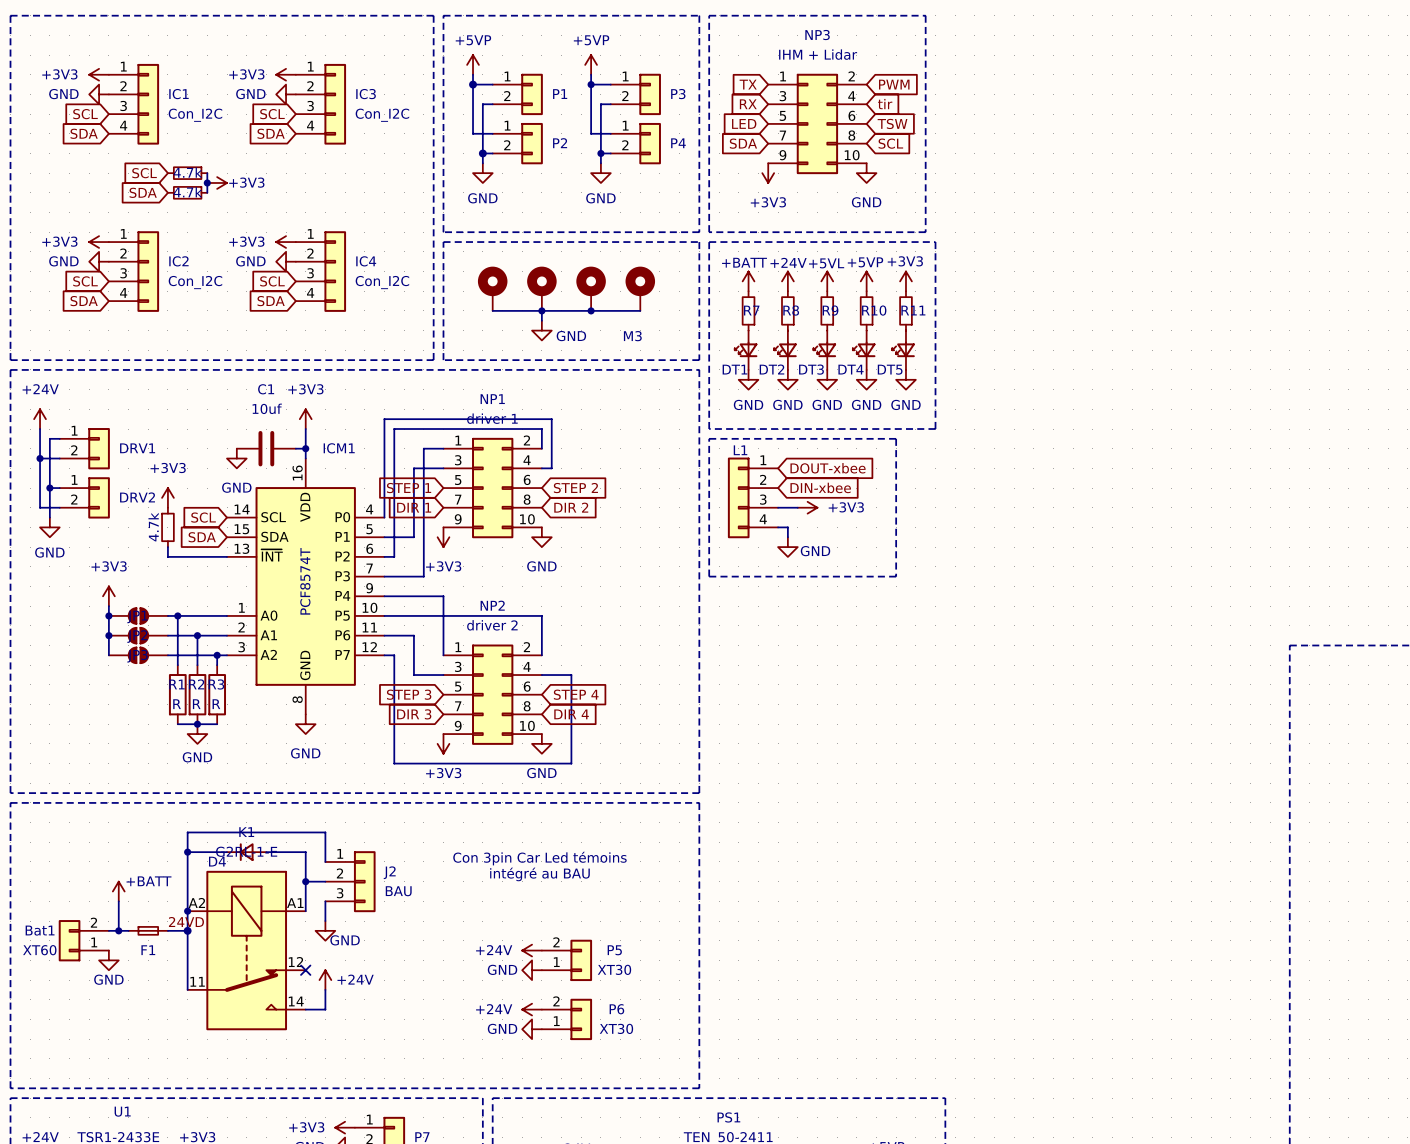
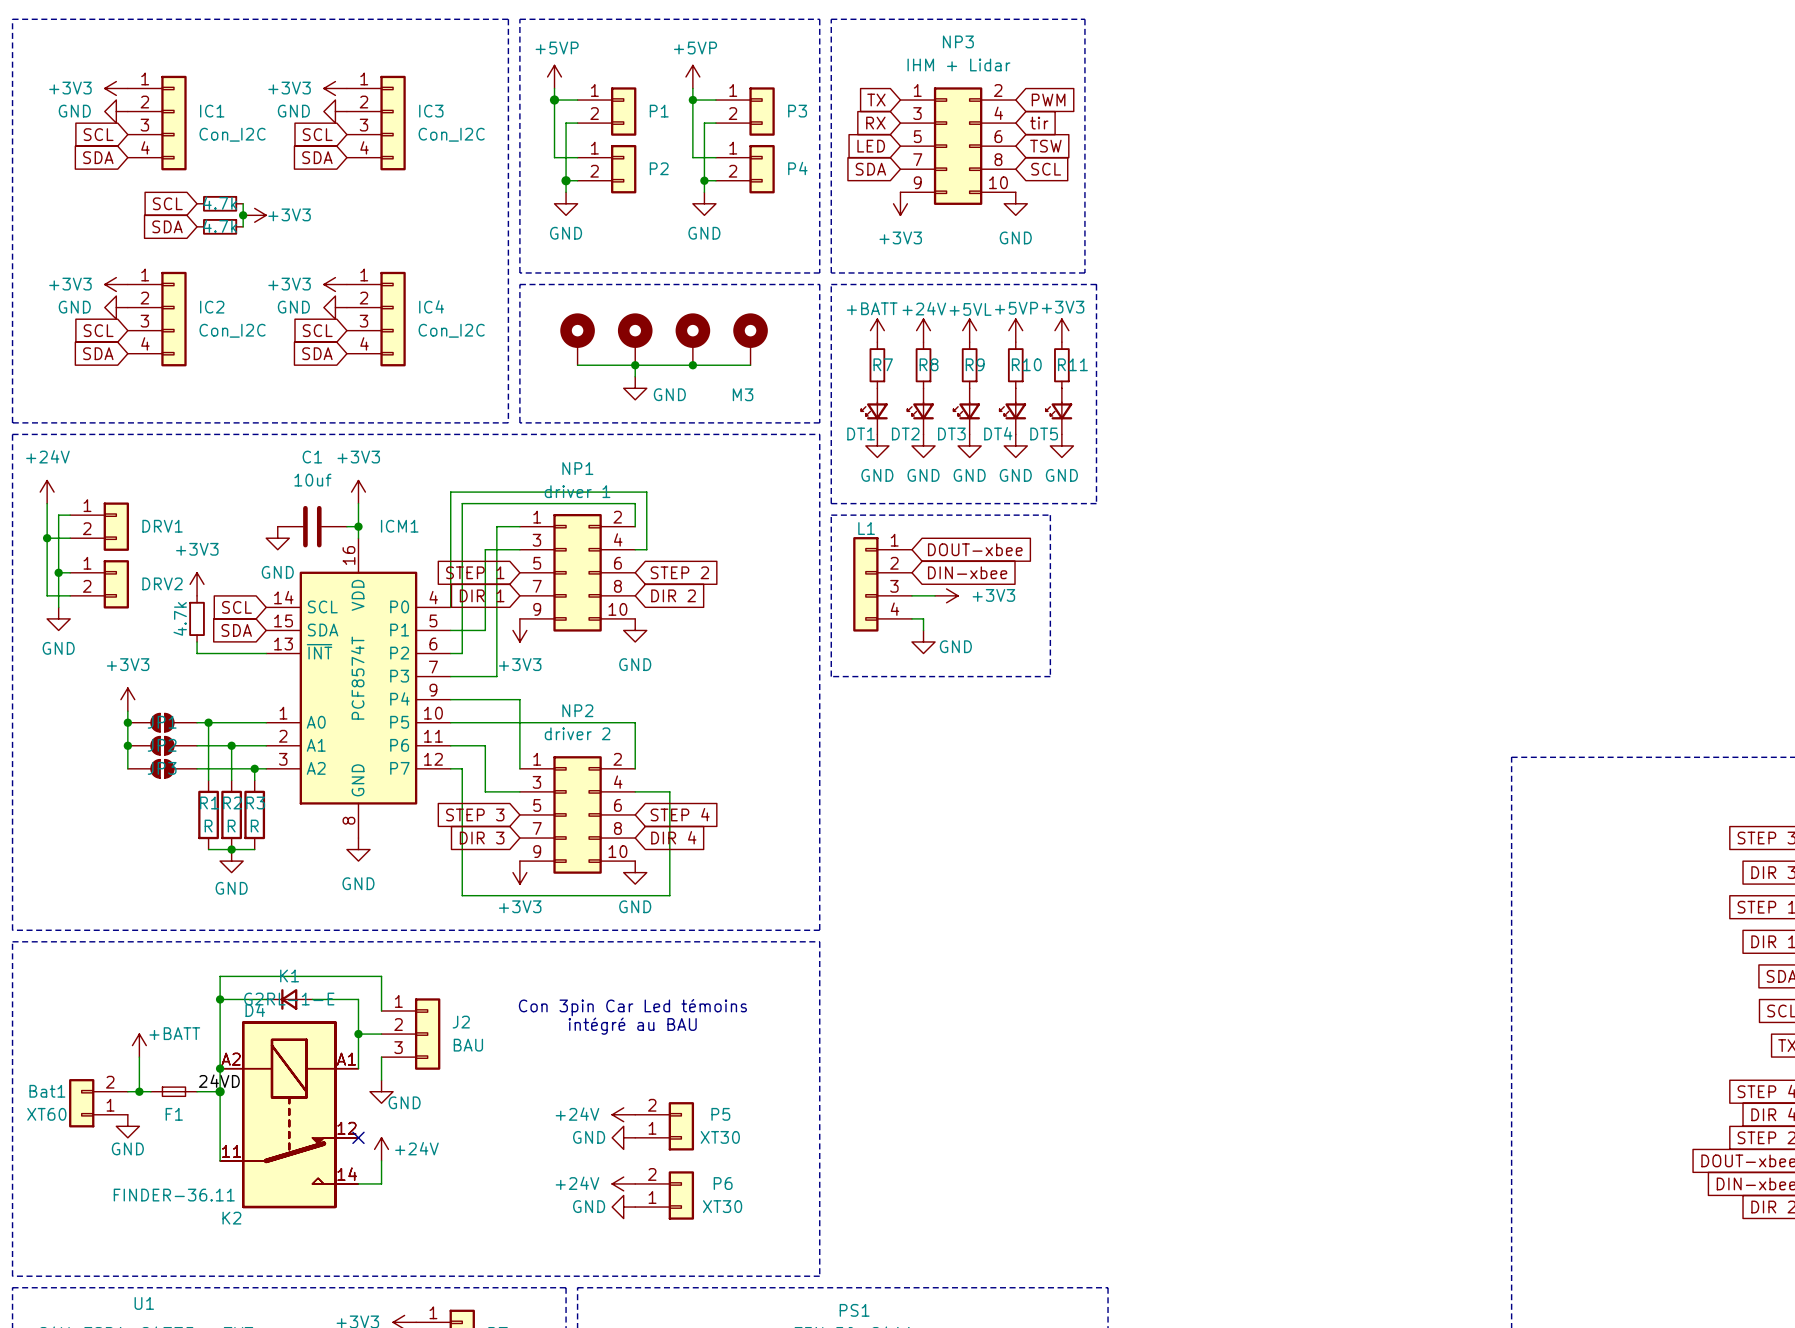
K2: none -> FINDER-36.11 (289, 1114)

